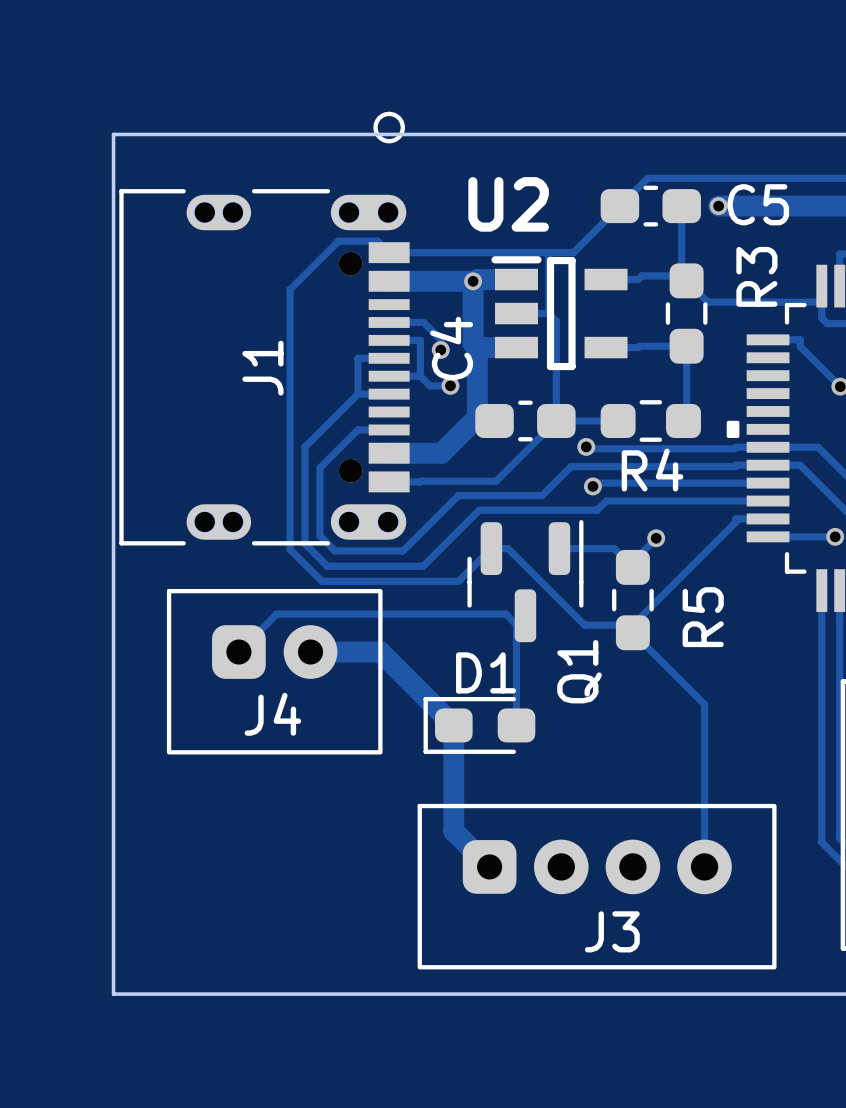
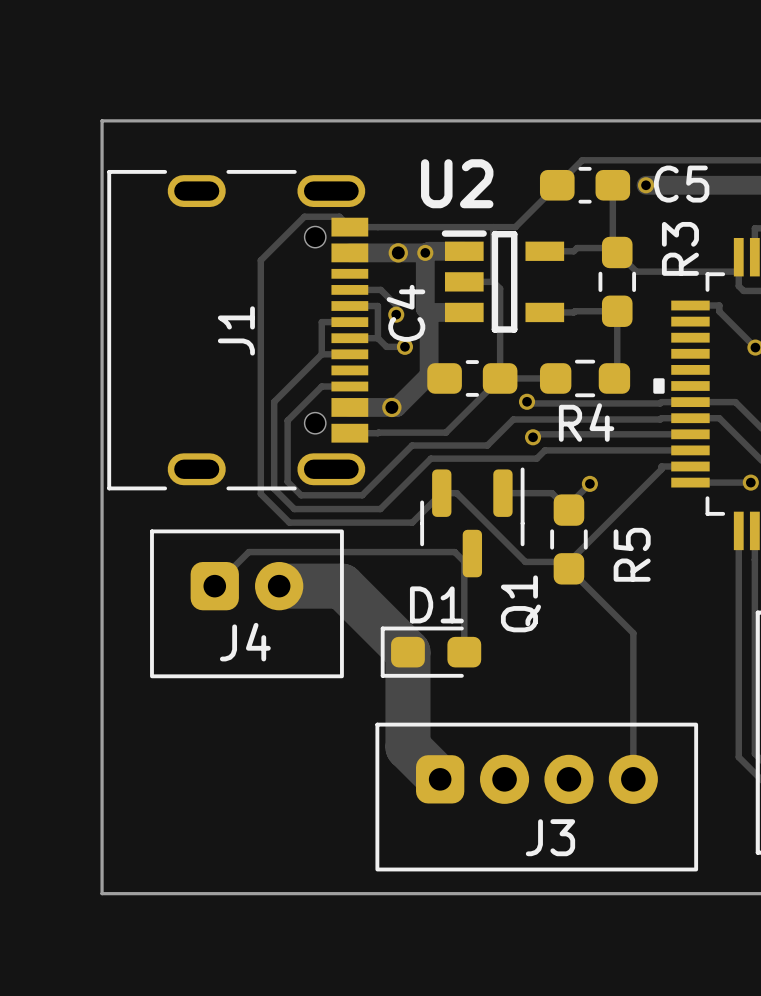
J1 footprint: [119, 111, 410, 546] -> [107, 169, 369, 491]
via: none -> (398, 252)
via: none -> (391, 407)
track width: thin (310, 652) (380, 652) (453, 725) (453, 831) (489, 866) -> thick (279, 586) (341, 586) (407, 652) (407, 747) (440, 779)

